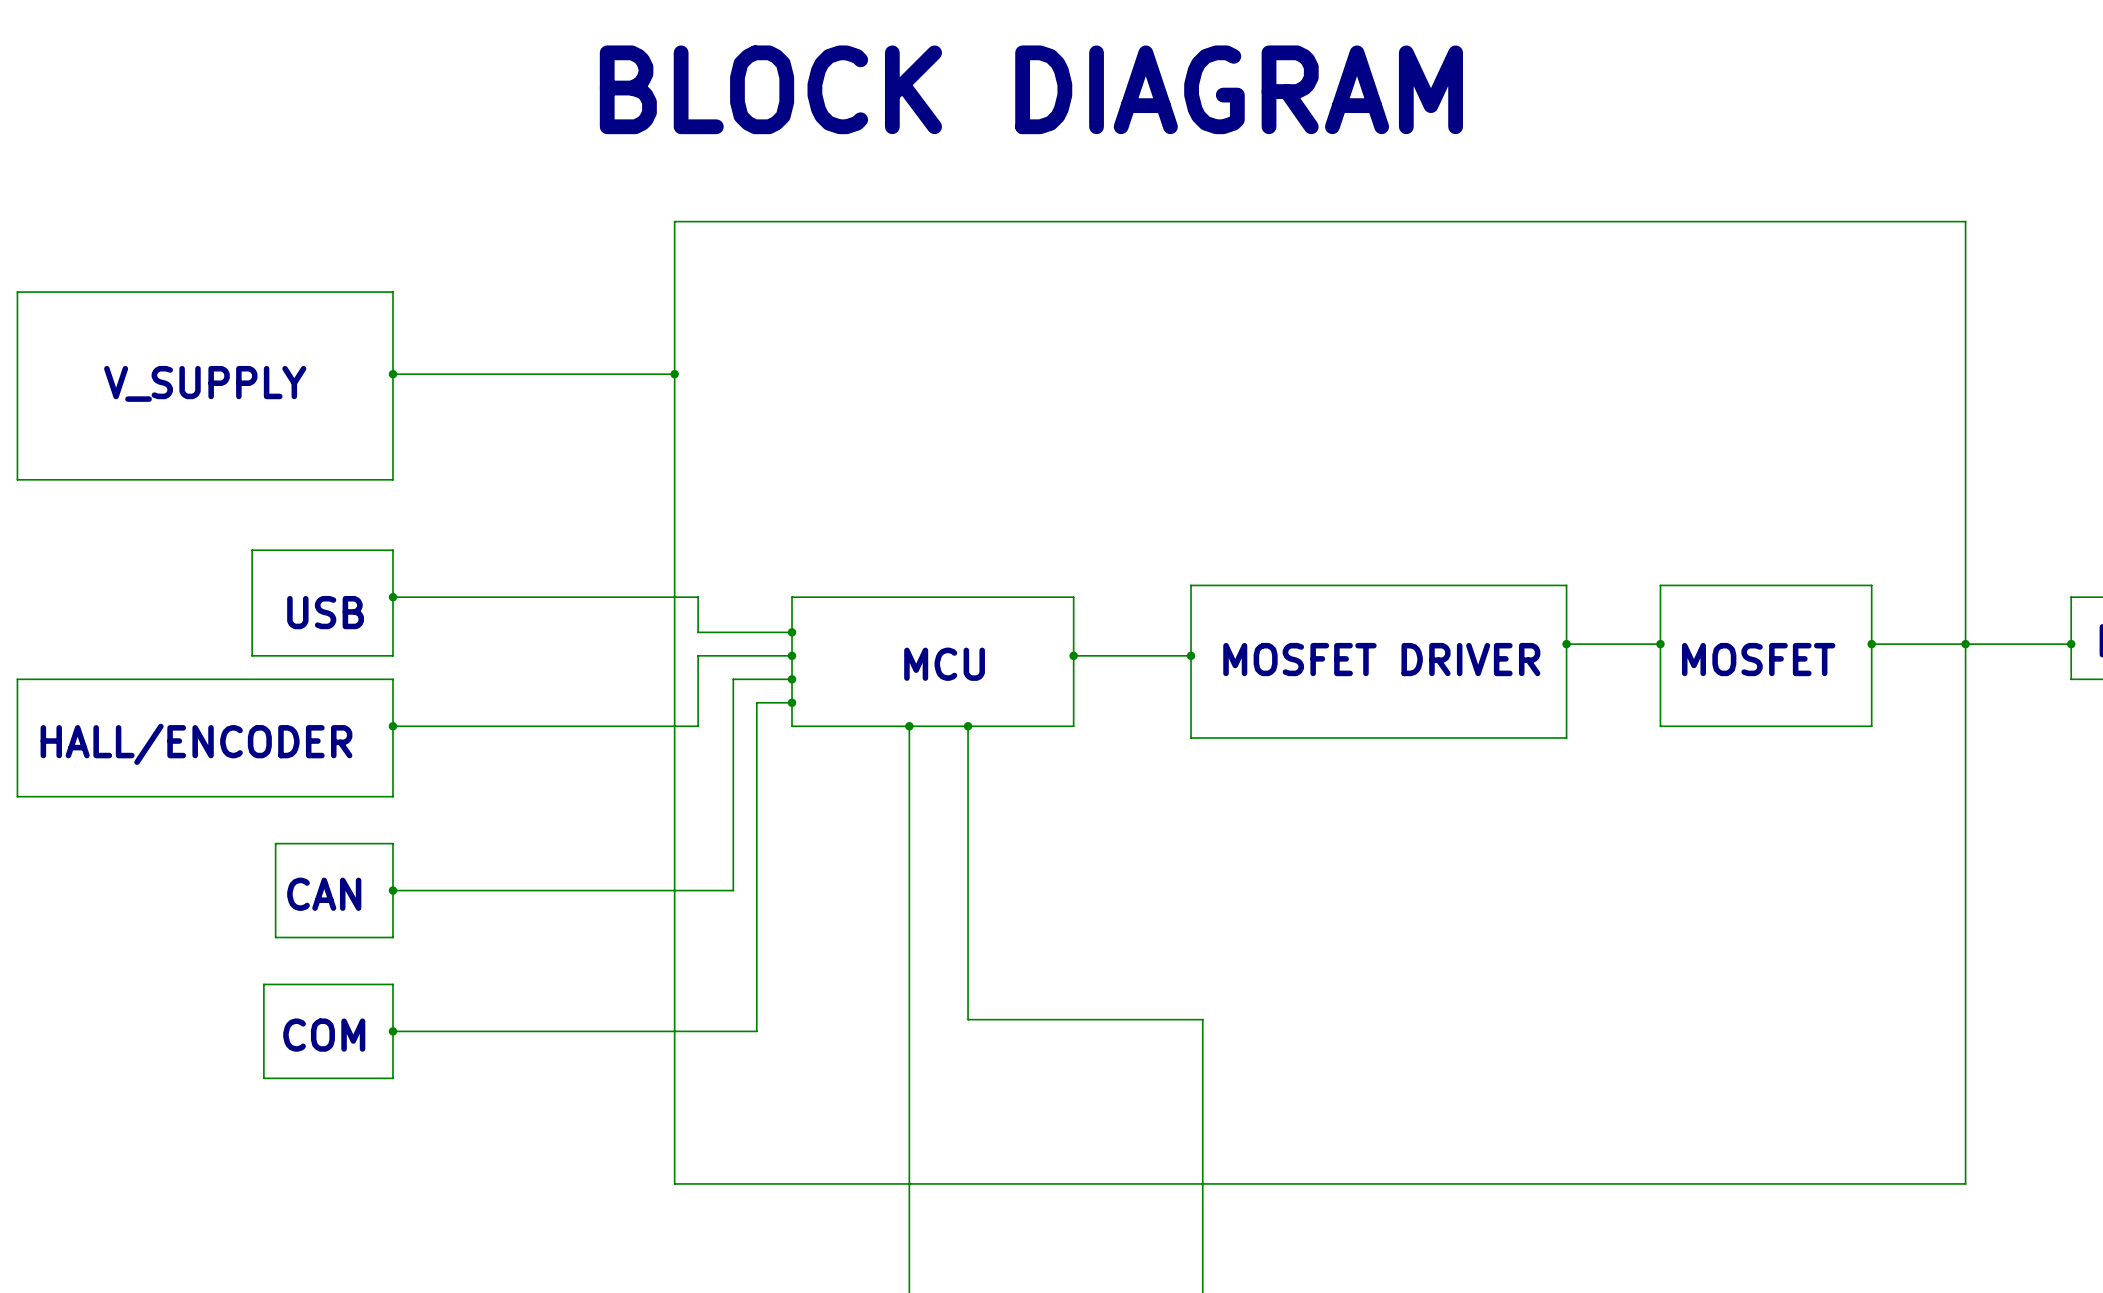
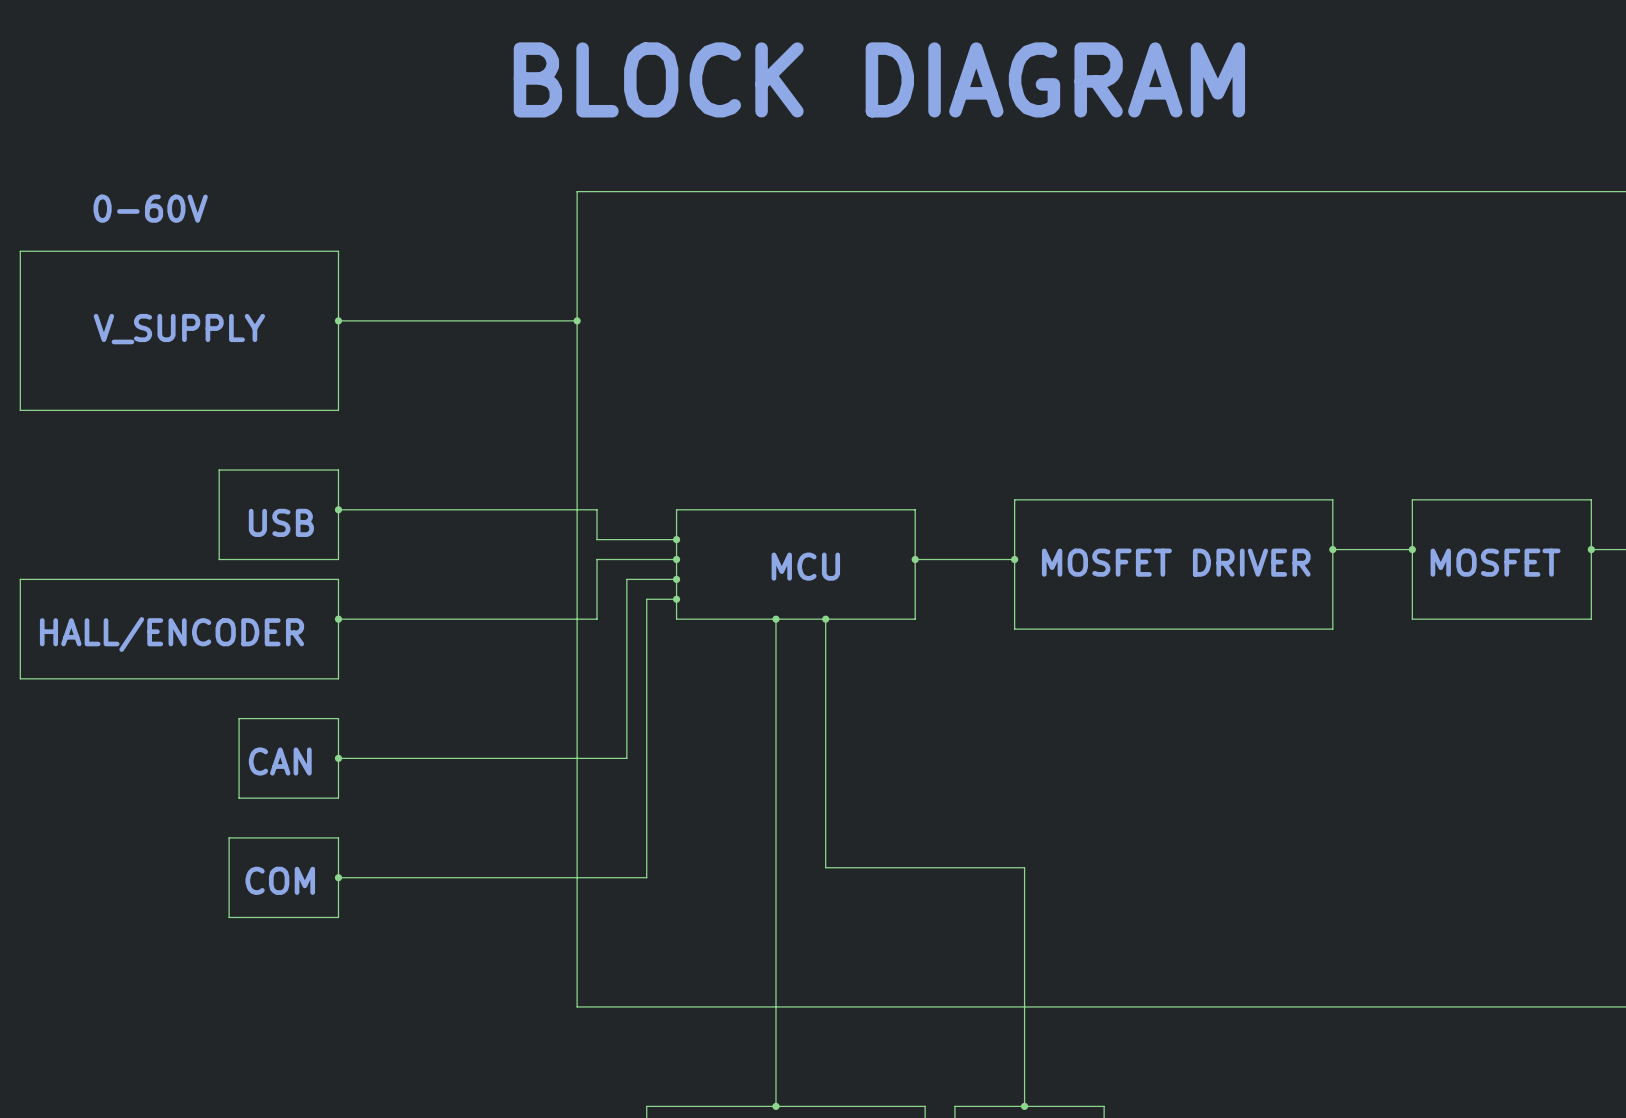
text: none -> 0-60V (150, 208)

